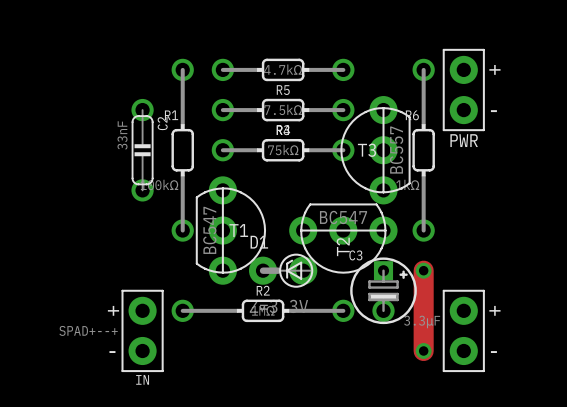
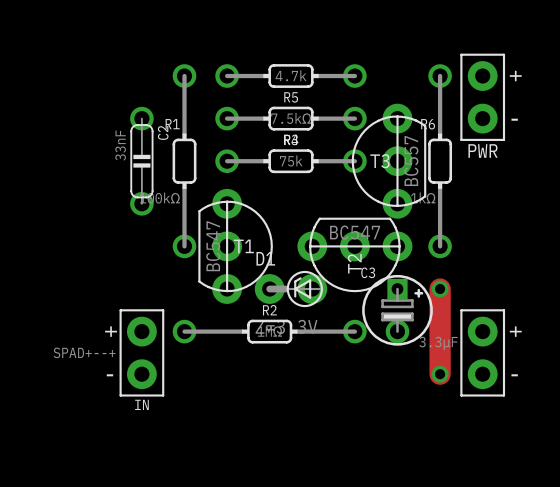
R5 value: 4.7kΩ (283, 69) -> 4.7k (291, 75)
part value: 75kΩ (283, 150) -> 75k (291, 160)

